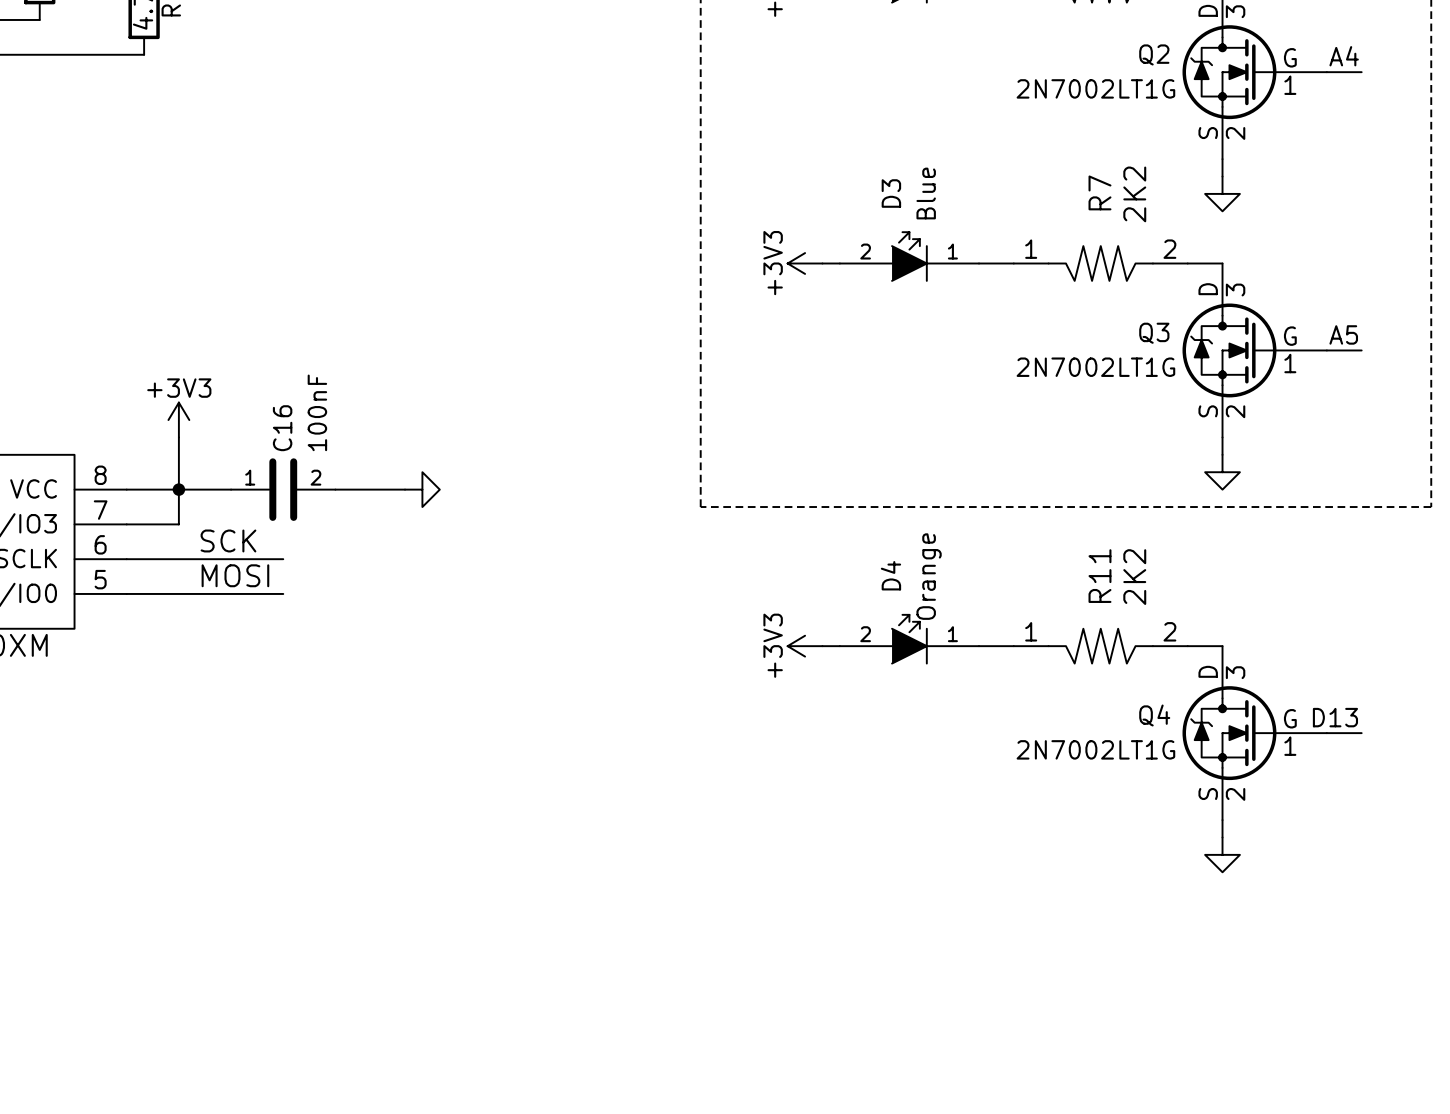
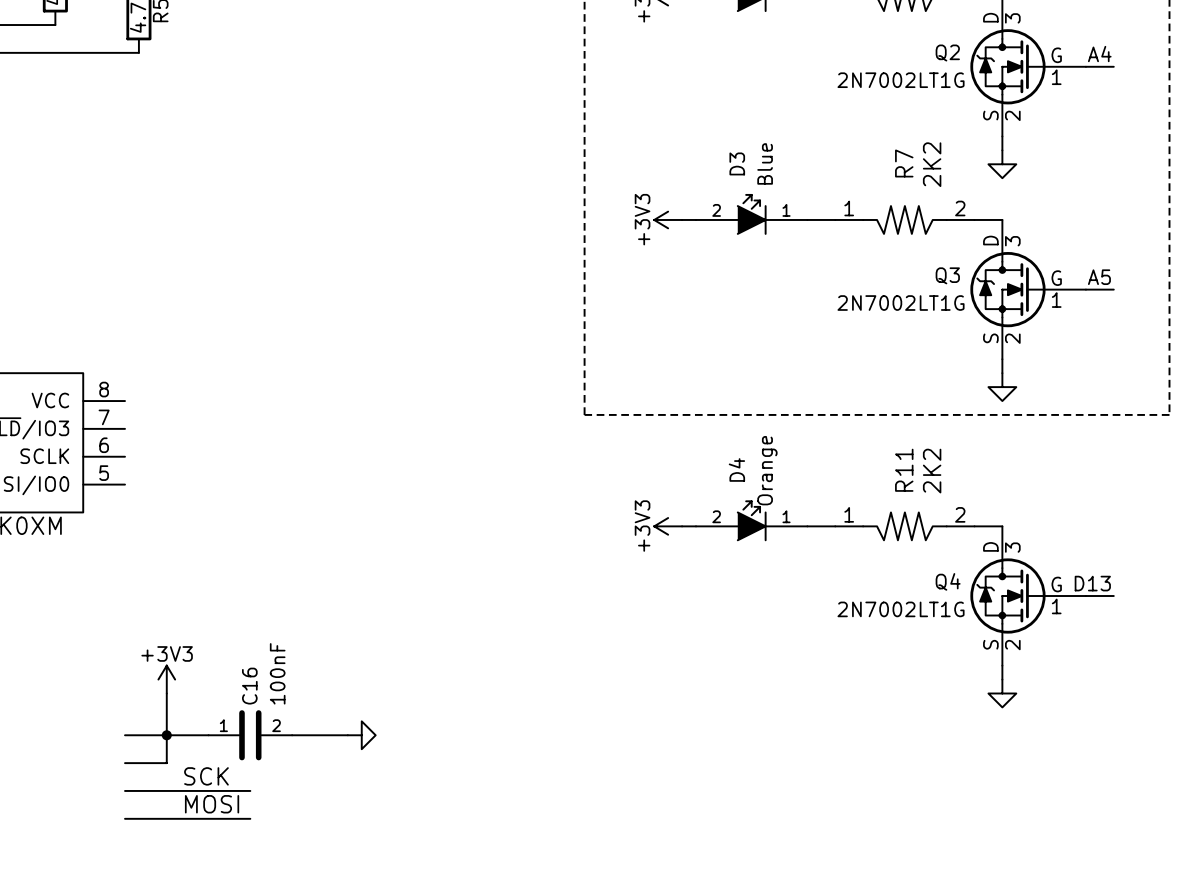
power symbol: +3V3 (178, 420) -> none
wire: (178, 437) (178, 524) (126, 524) -> none
wire: (126, 489) (231, 489) -> none
junction: (178, 489) -> none
C16 position: (283, 489) -> (250, 735)
wire: (335, 489) (405, 489) -> none
power symbol: (422, 489) -> none
label: SCK (228, 540) -> none
wire: (126, 559) (283, 559) -> none
label: MOSI (235, 575) -> none
wire: (126, 593) (283, 593) -> none
power symbol: none -> +3V3 (166, 679)
wire: none -> (166, 693) (166, 763) (125, 763)
wire: none -> (125, 735) (208, 735)
junction: none -> (166, 735)
wire: none -> (292, 735) (347, 735)
power symbol: none -> (361, 735)
label: none -> SCK (206, 776)
wire: none -> (125, 790) (250, 790)
label: none -> MOSI (212, 804)
wire: none -> (125, 818) (250, 818)

